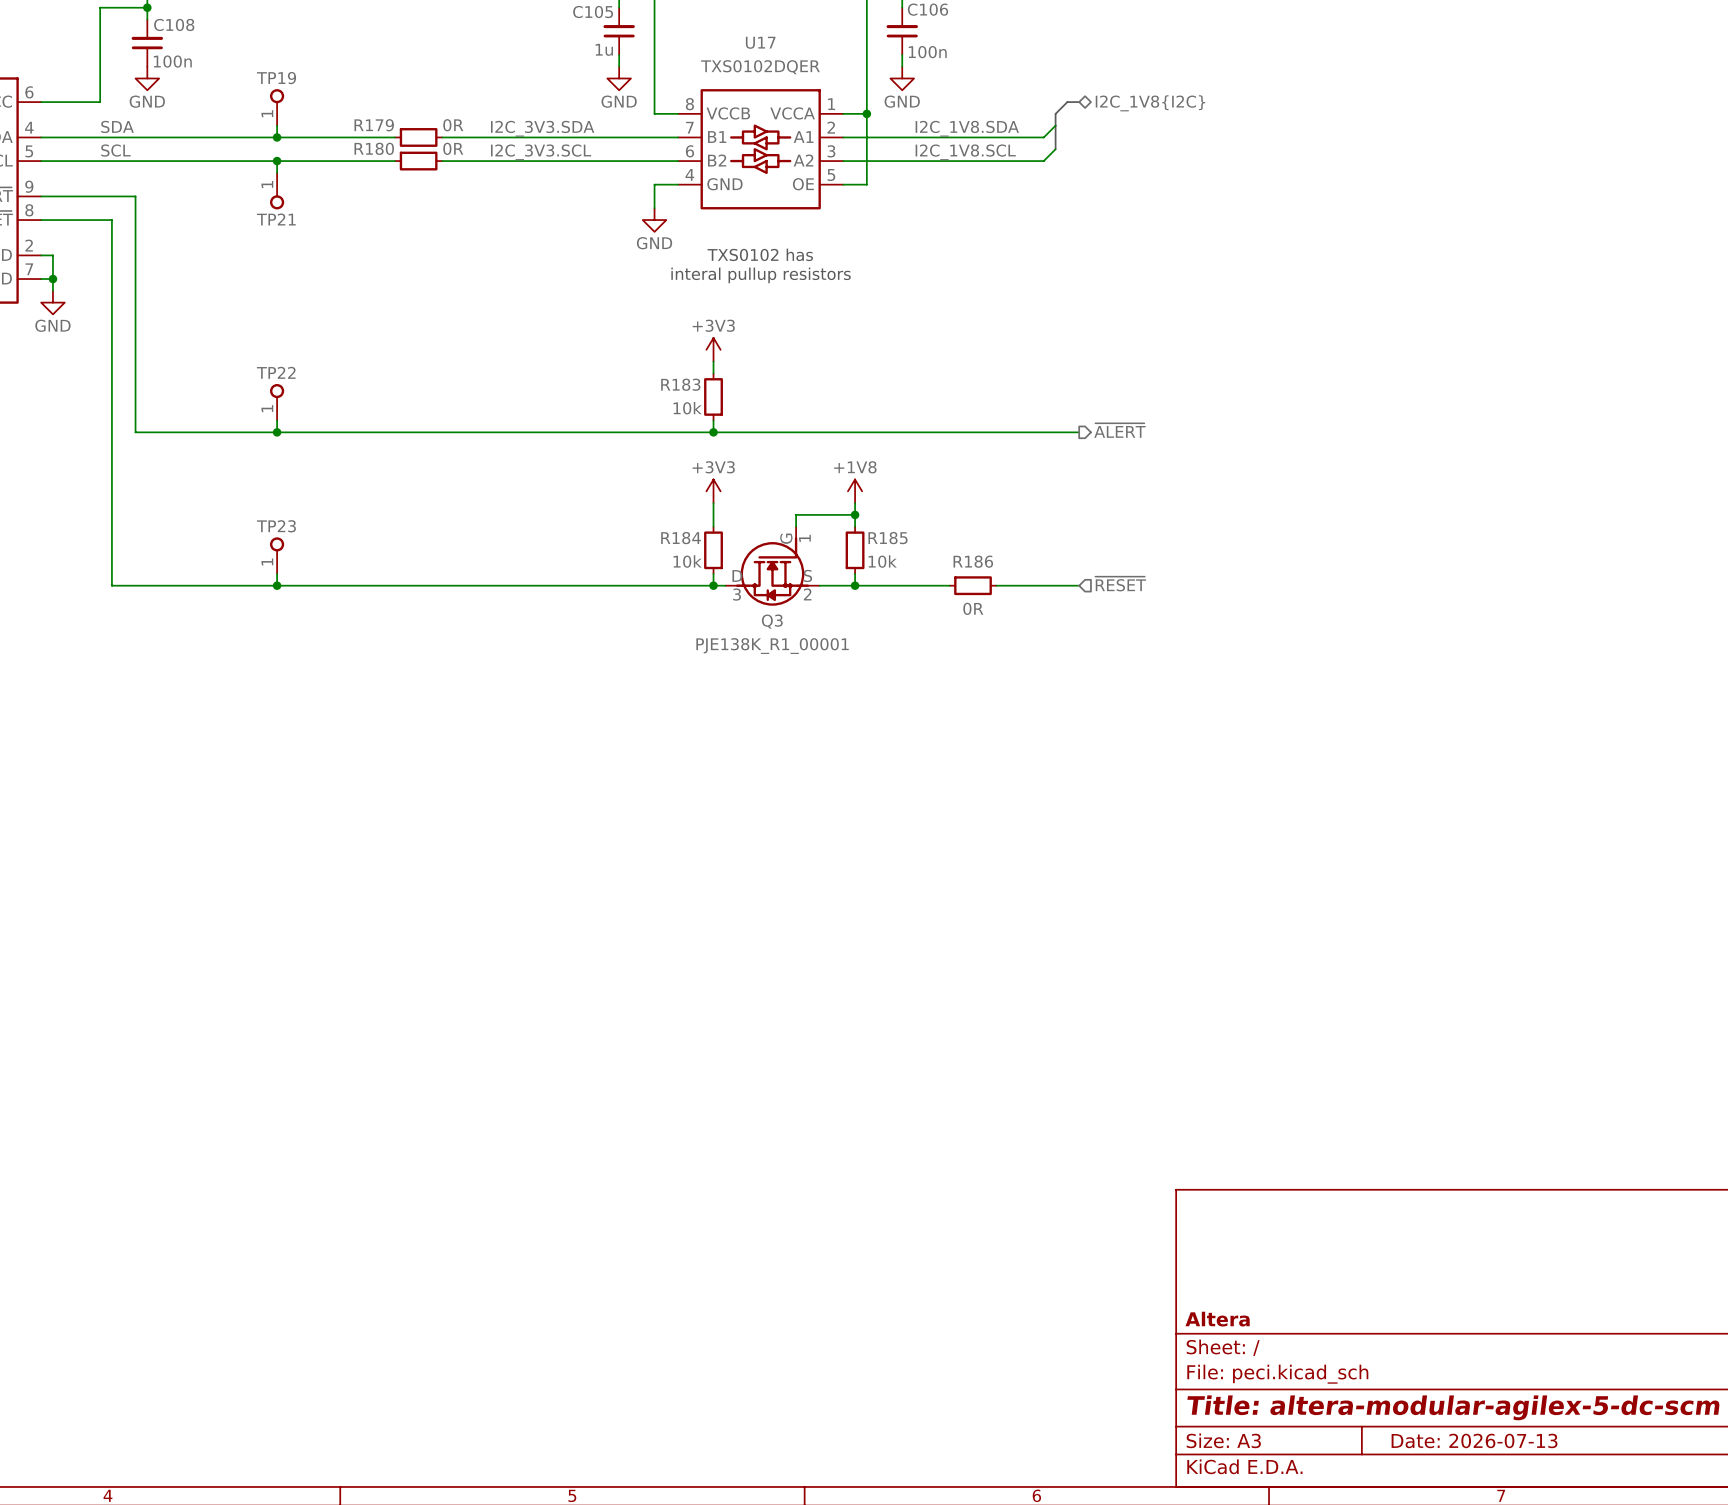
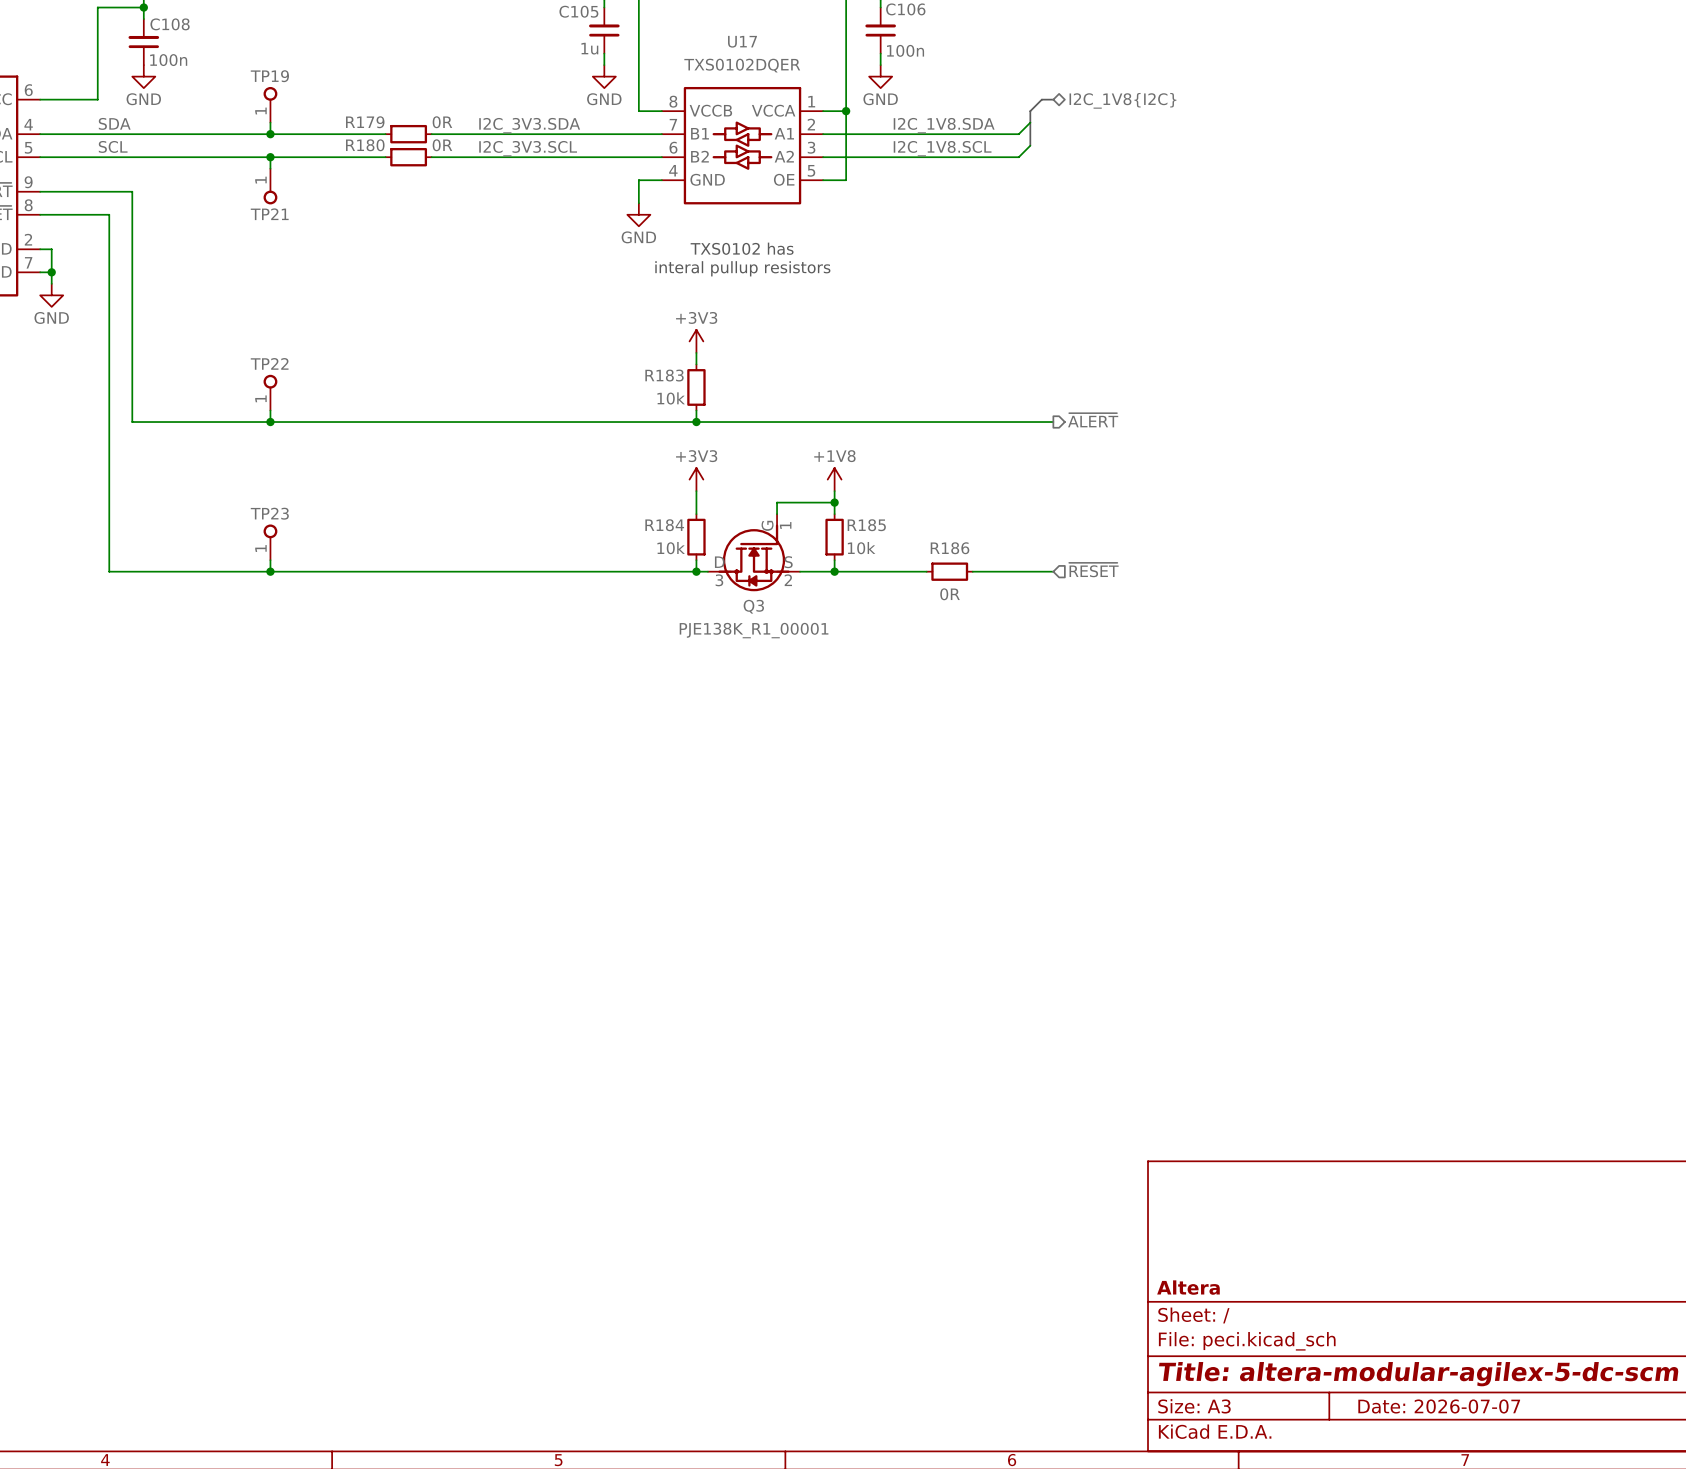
title block: Date: 2026-07-13 (1474, 1440) -> Date: 2026-07-07 (1439, 1406)

